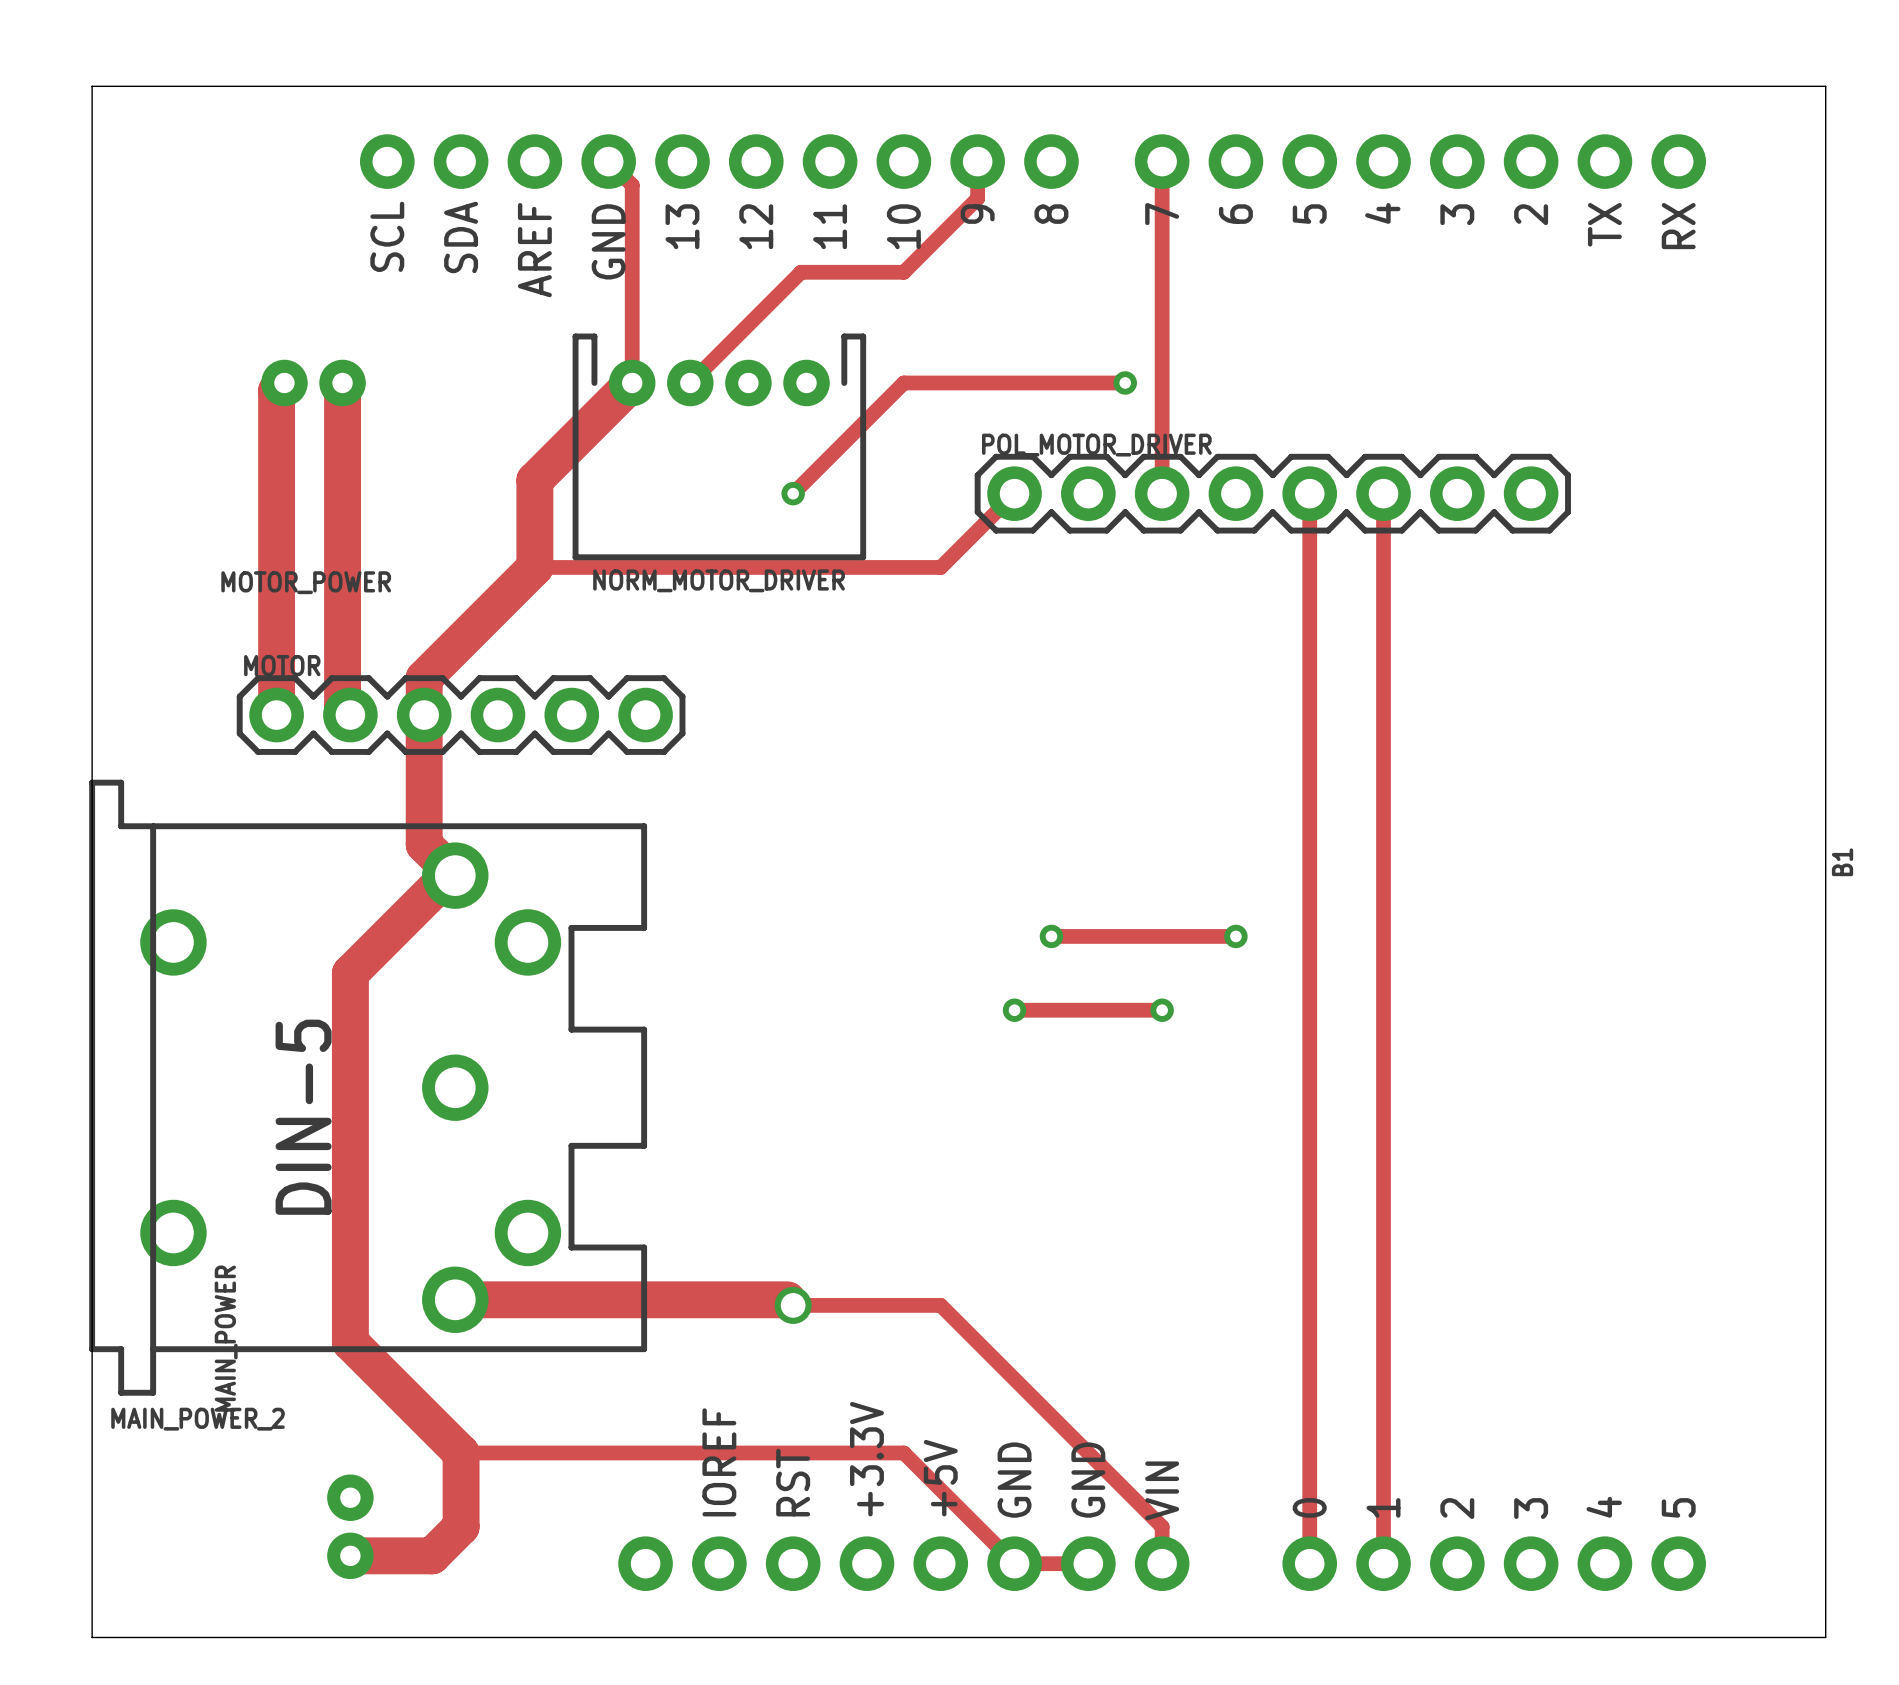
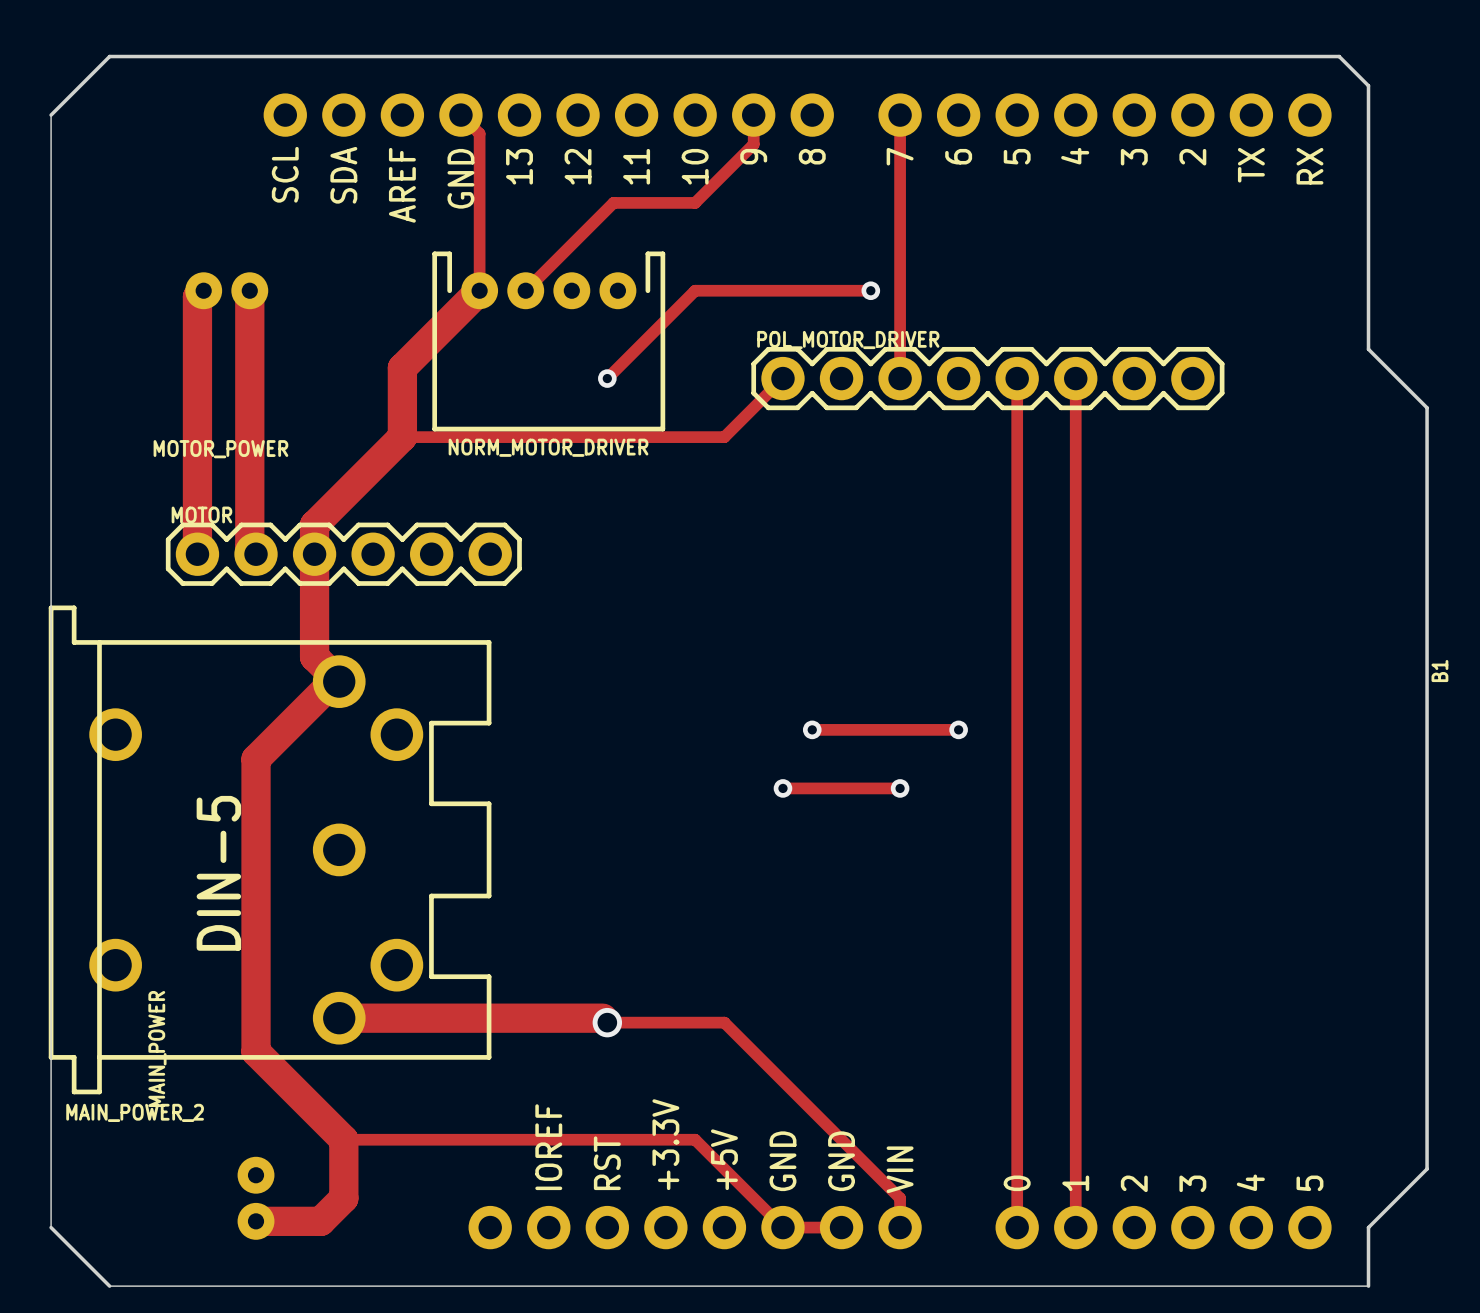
board edge: (92, 161) (92, 86) (1825, 86) (1825, 1637) (1752, 1637) -> (51, 115) (109, 56) (1339, 56) (1368, 85) (1368, 349) (1427, 407) (1427, 1169) (1368, 1227) (1368, 1286)
board edge: (92, 1563) (92, 1637) (165, 1637) -> (51, 1227) (109, 1286)

